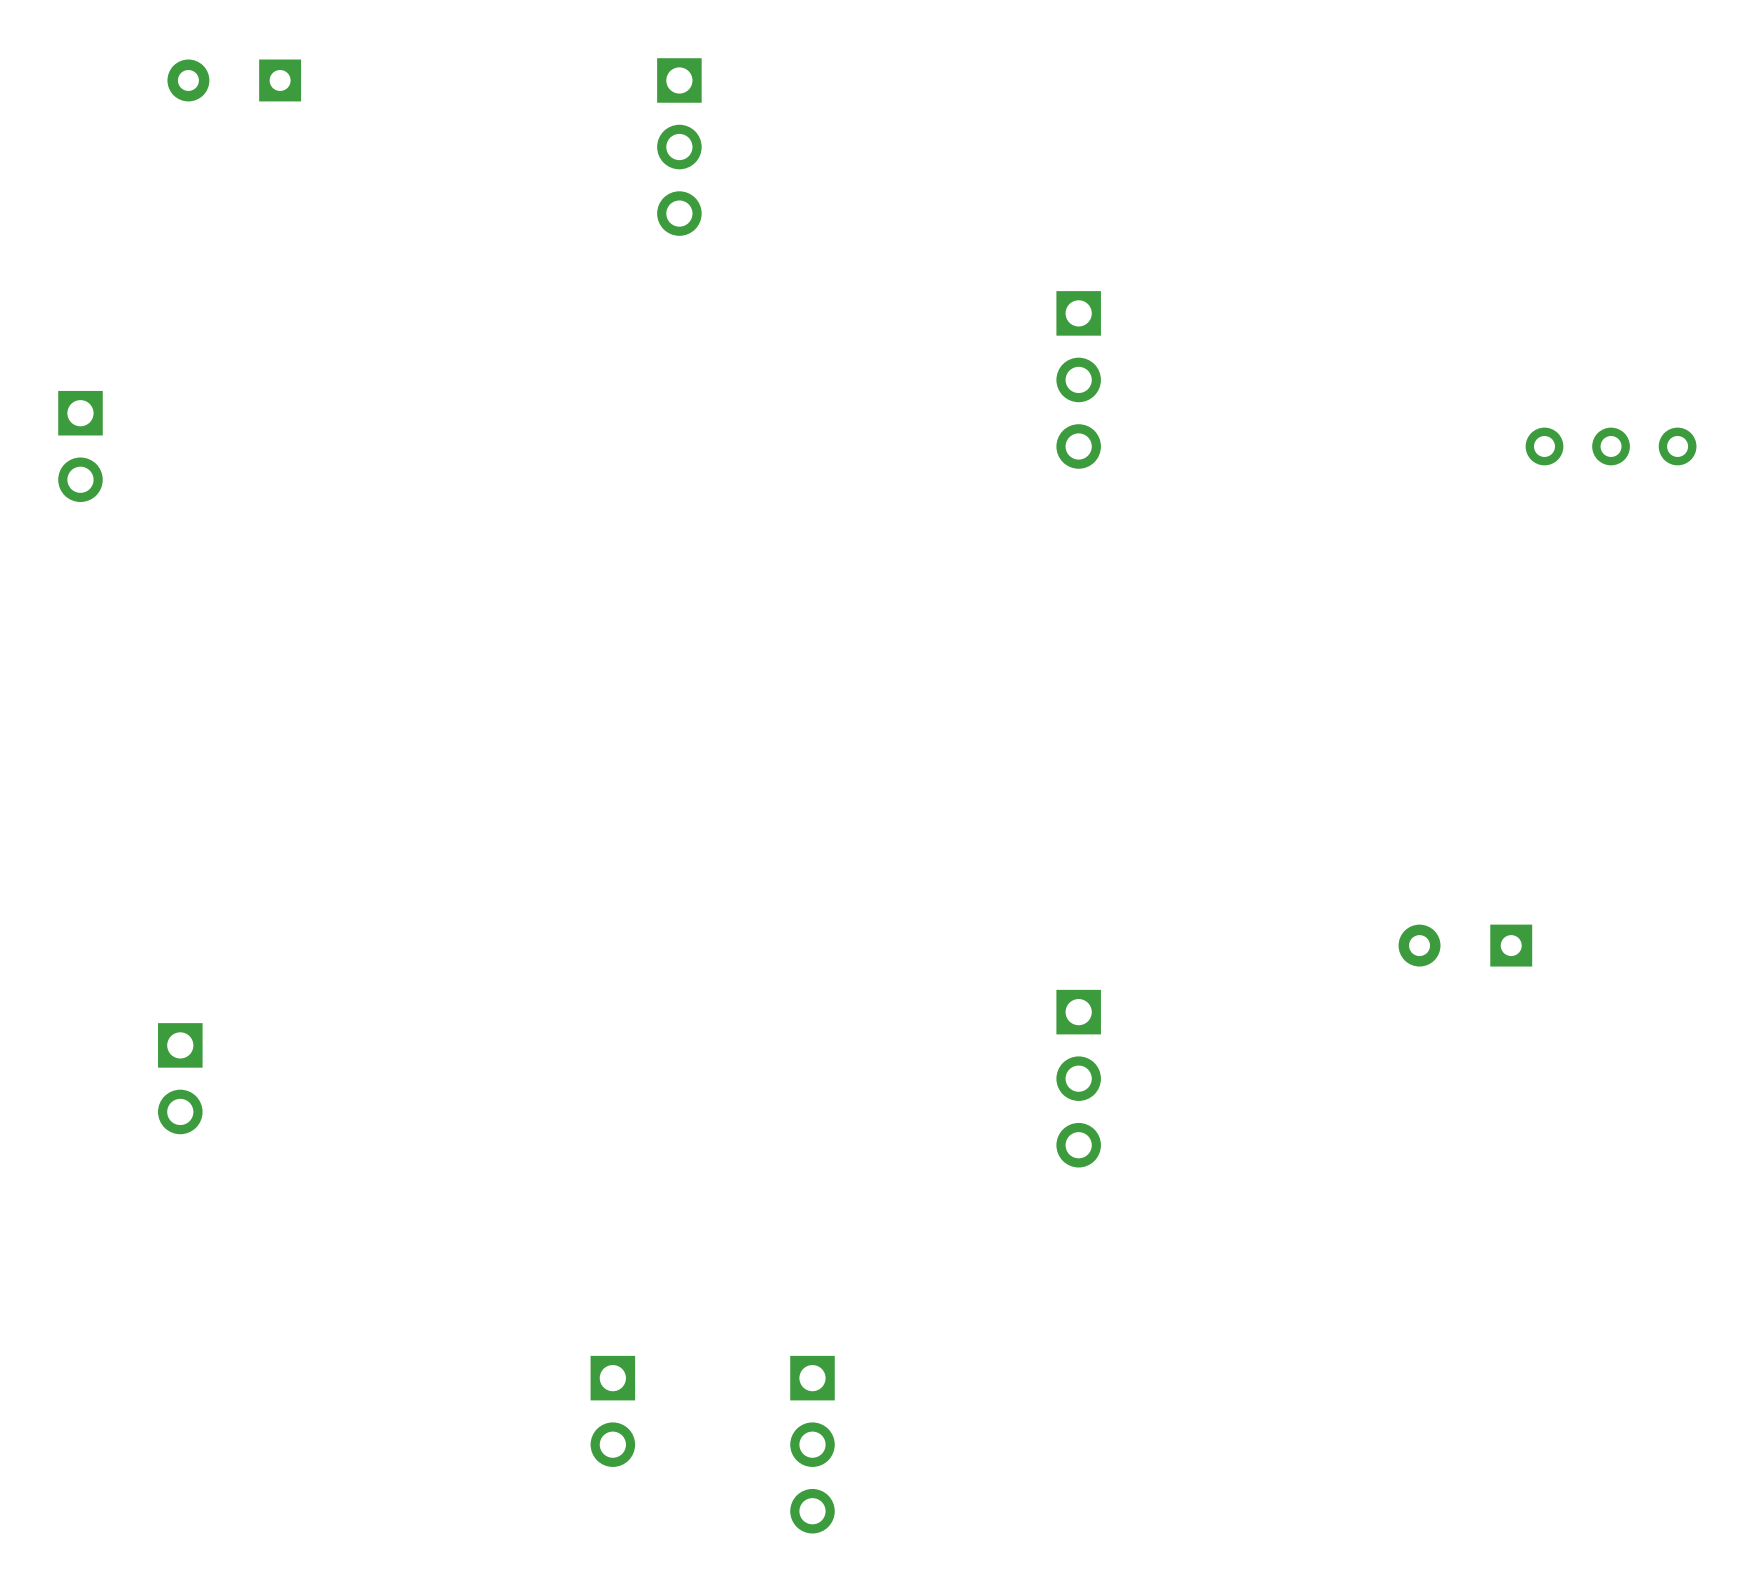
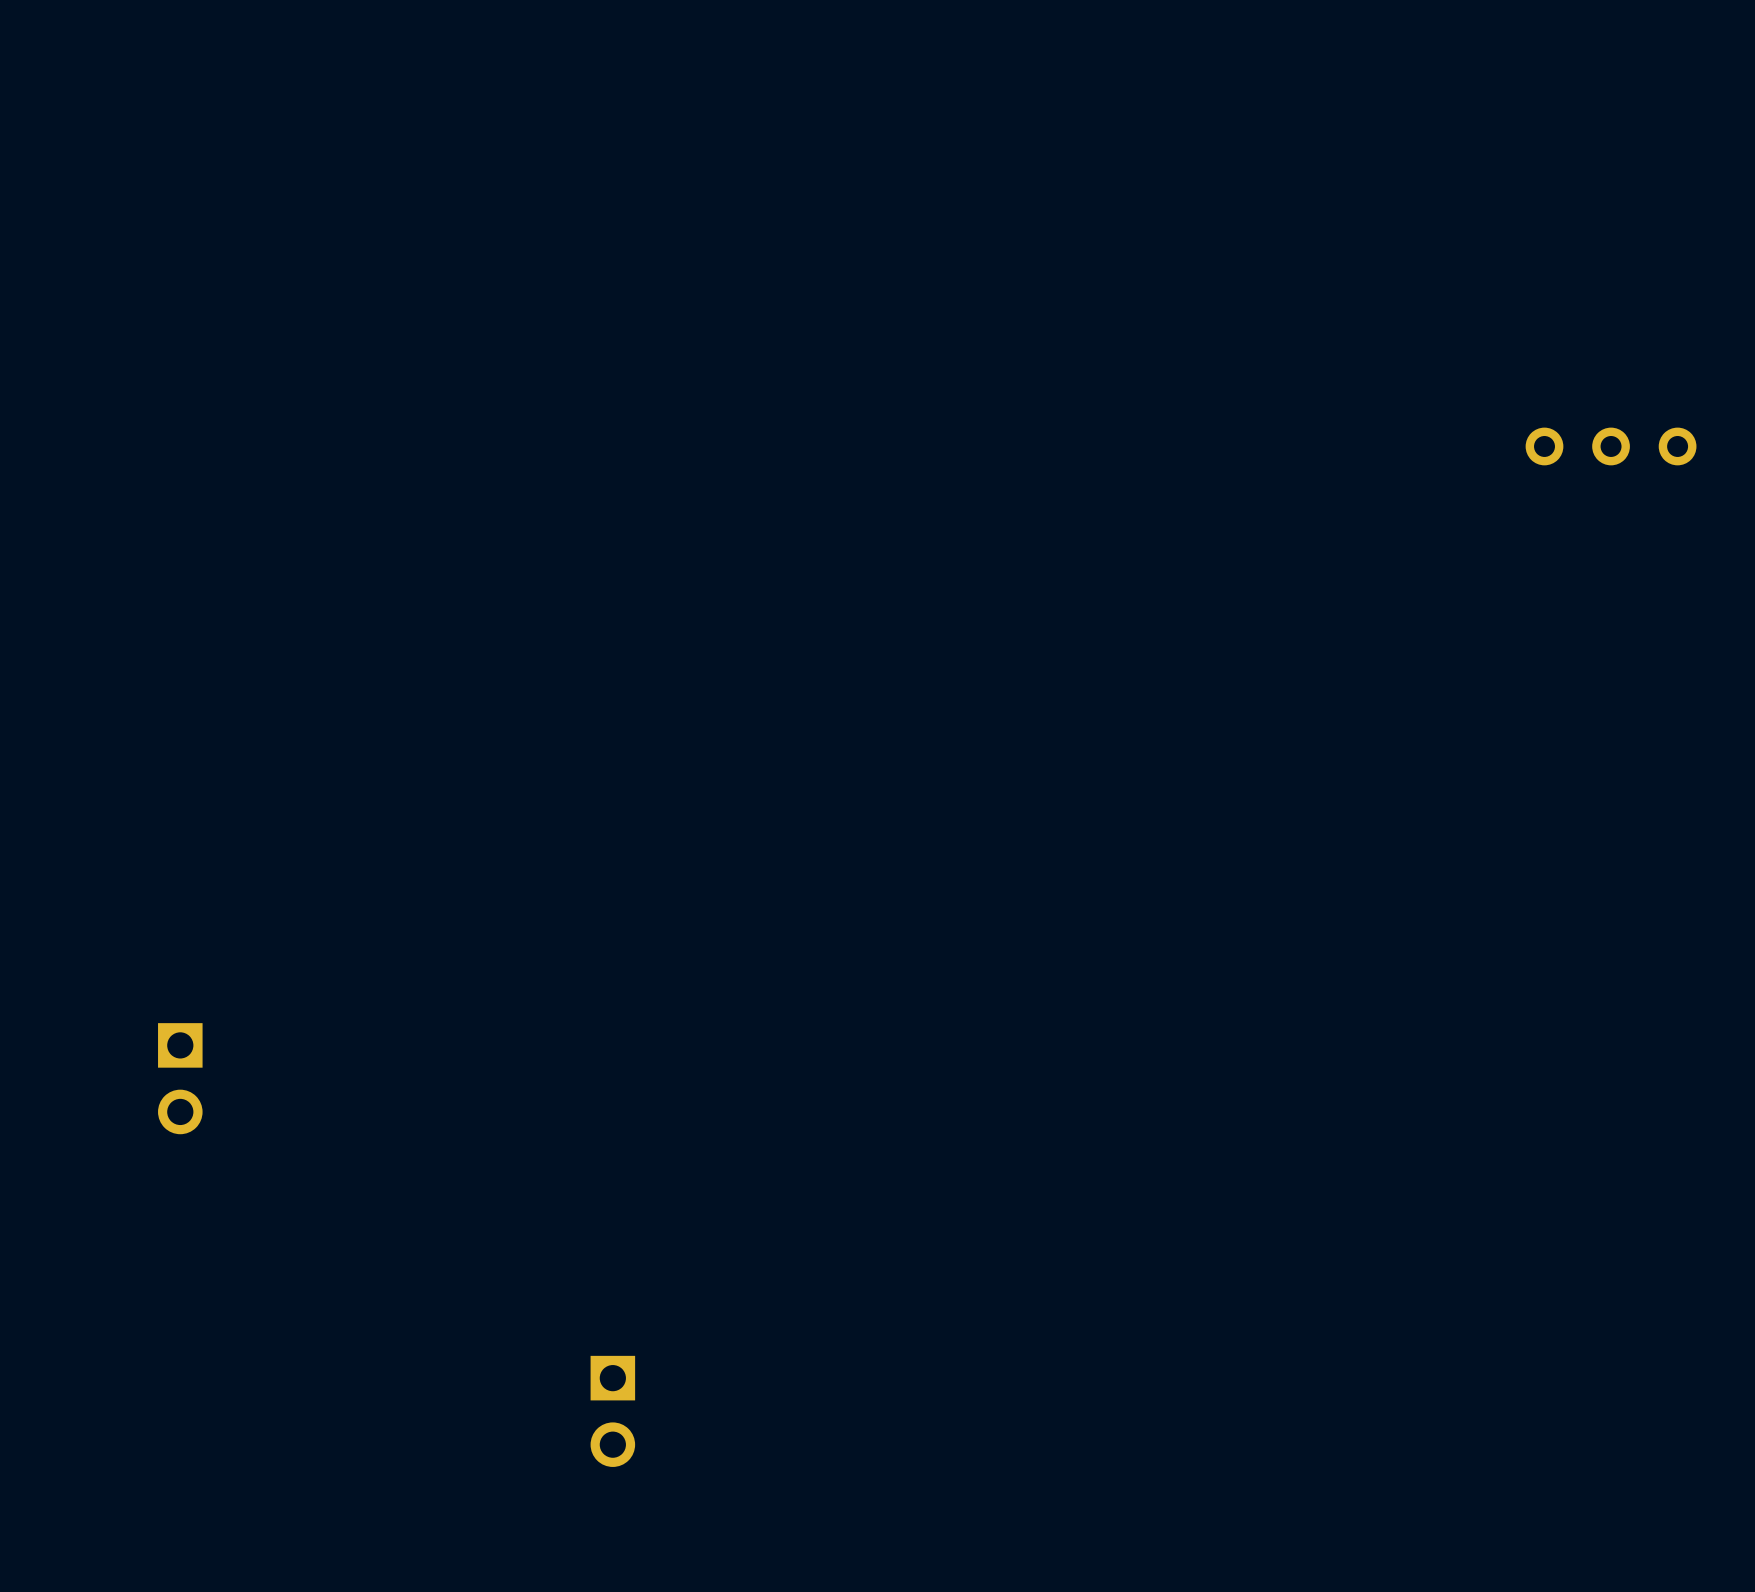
part: (234, 80) -> none
part: (679, 147) -> none
part: (1078, 379) -> none
part: (80, 446) -> none
part: (1465, 945) -> none
part: (1078, 1078) -> none
part: (812, 1444) -> none

